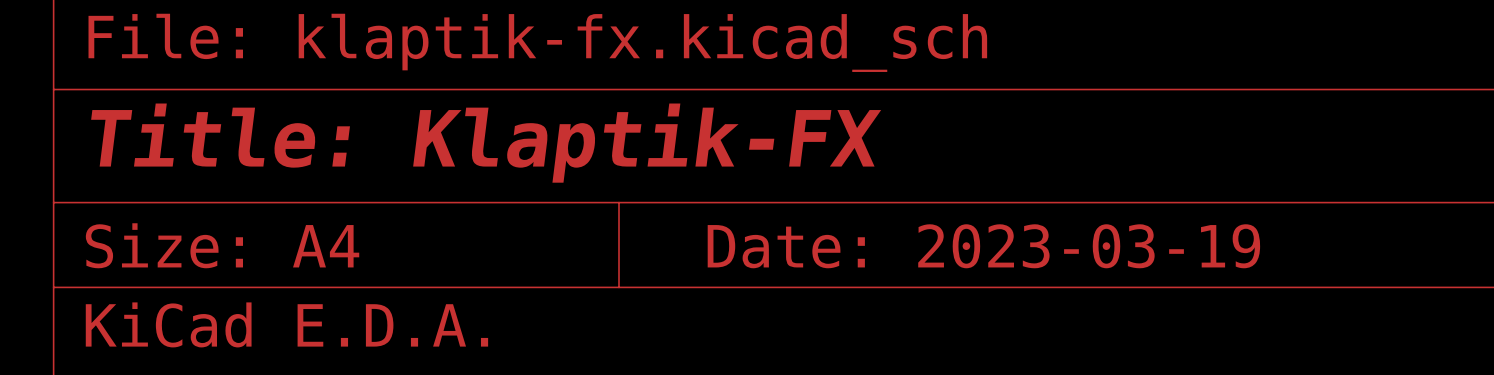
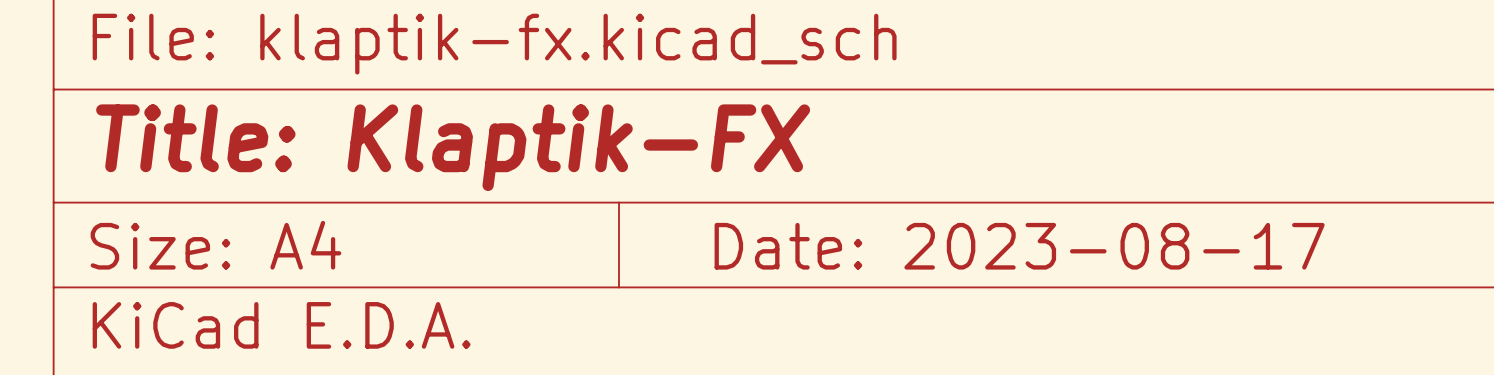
title block: Date: 2023-03-19 (983, 246) -> Date: 2023-08-17 (1019, 246)

